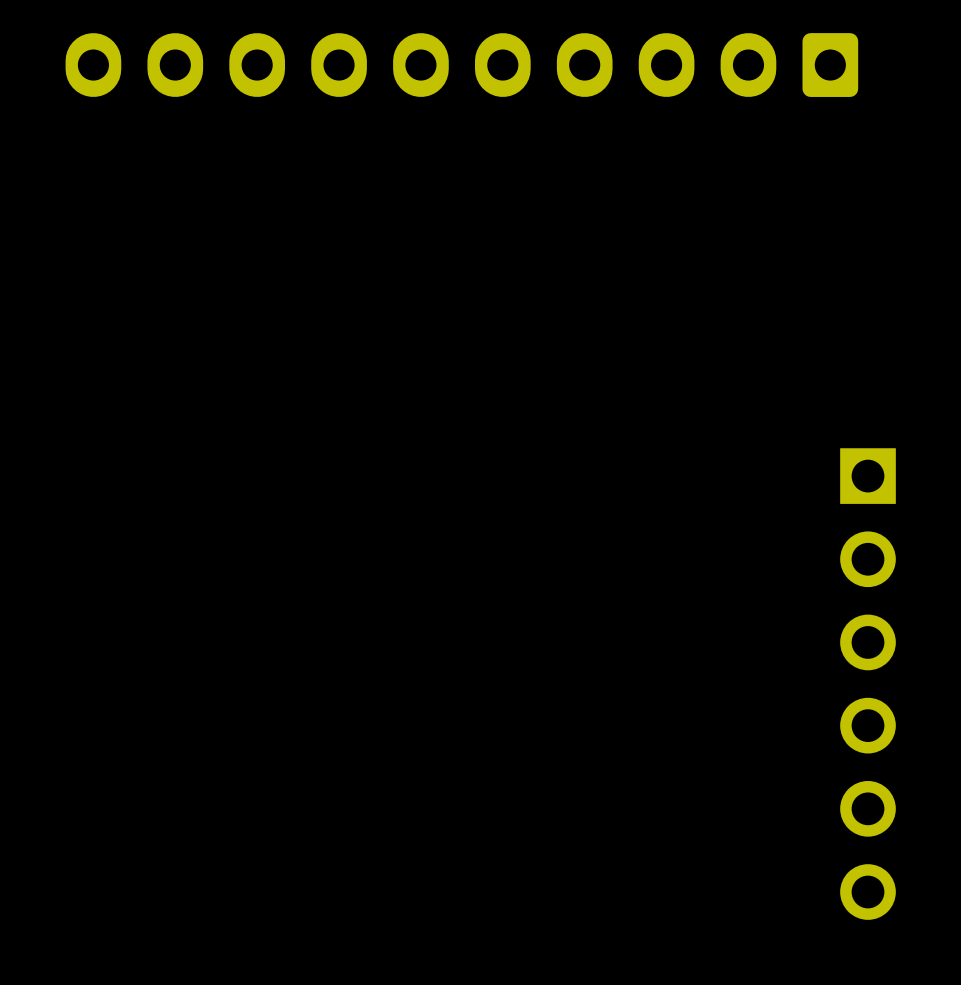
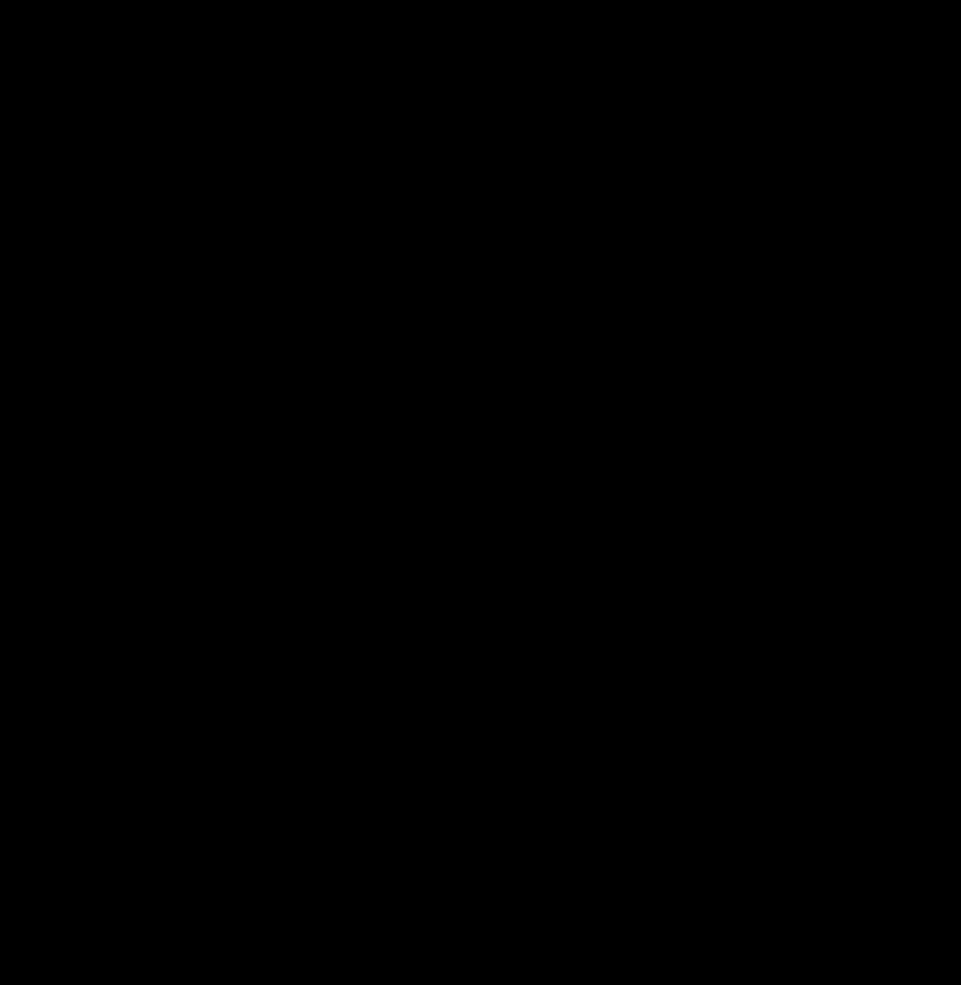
part: (461, 65) -> none
part: (868, 684) -> none

